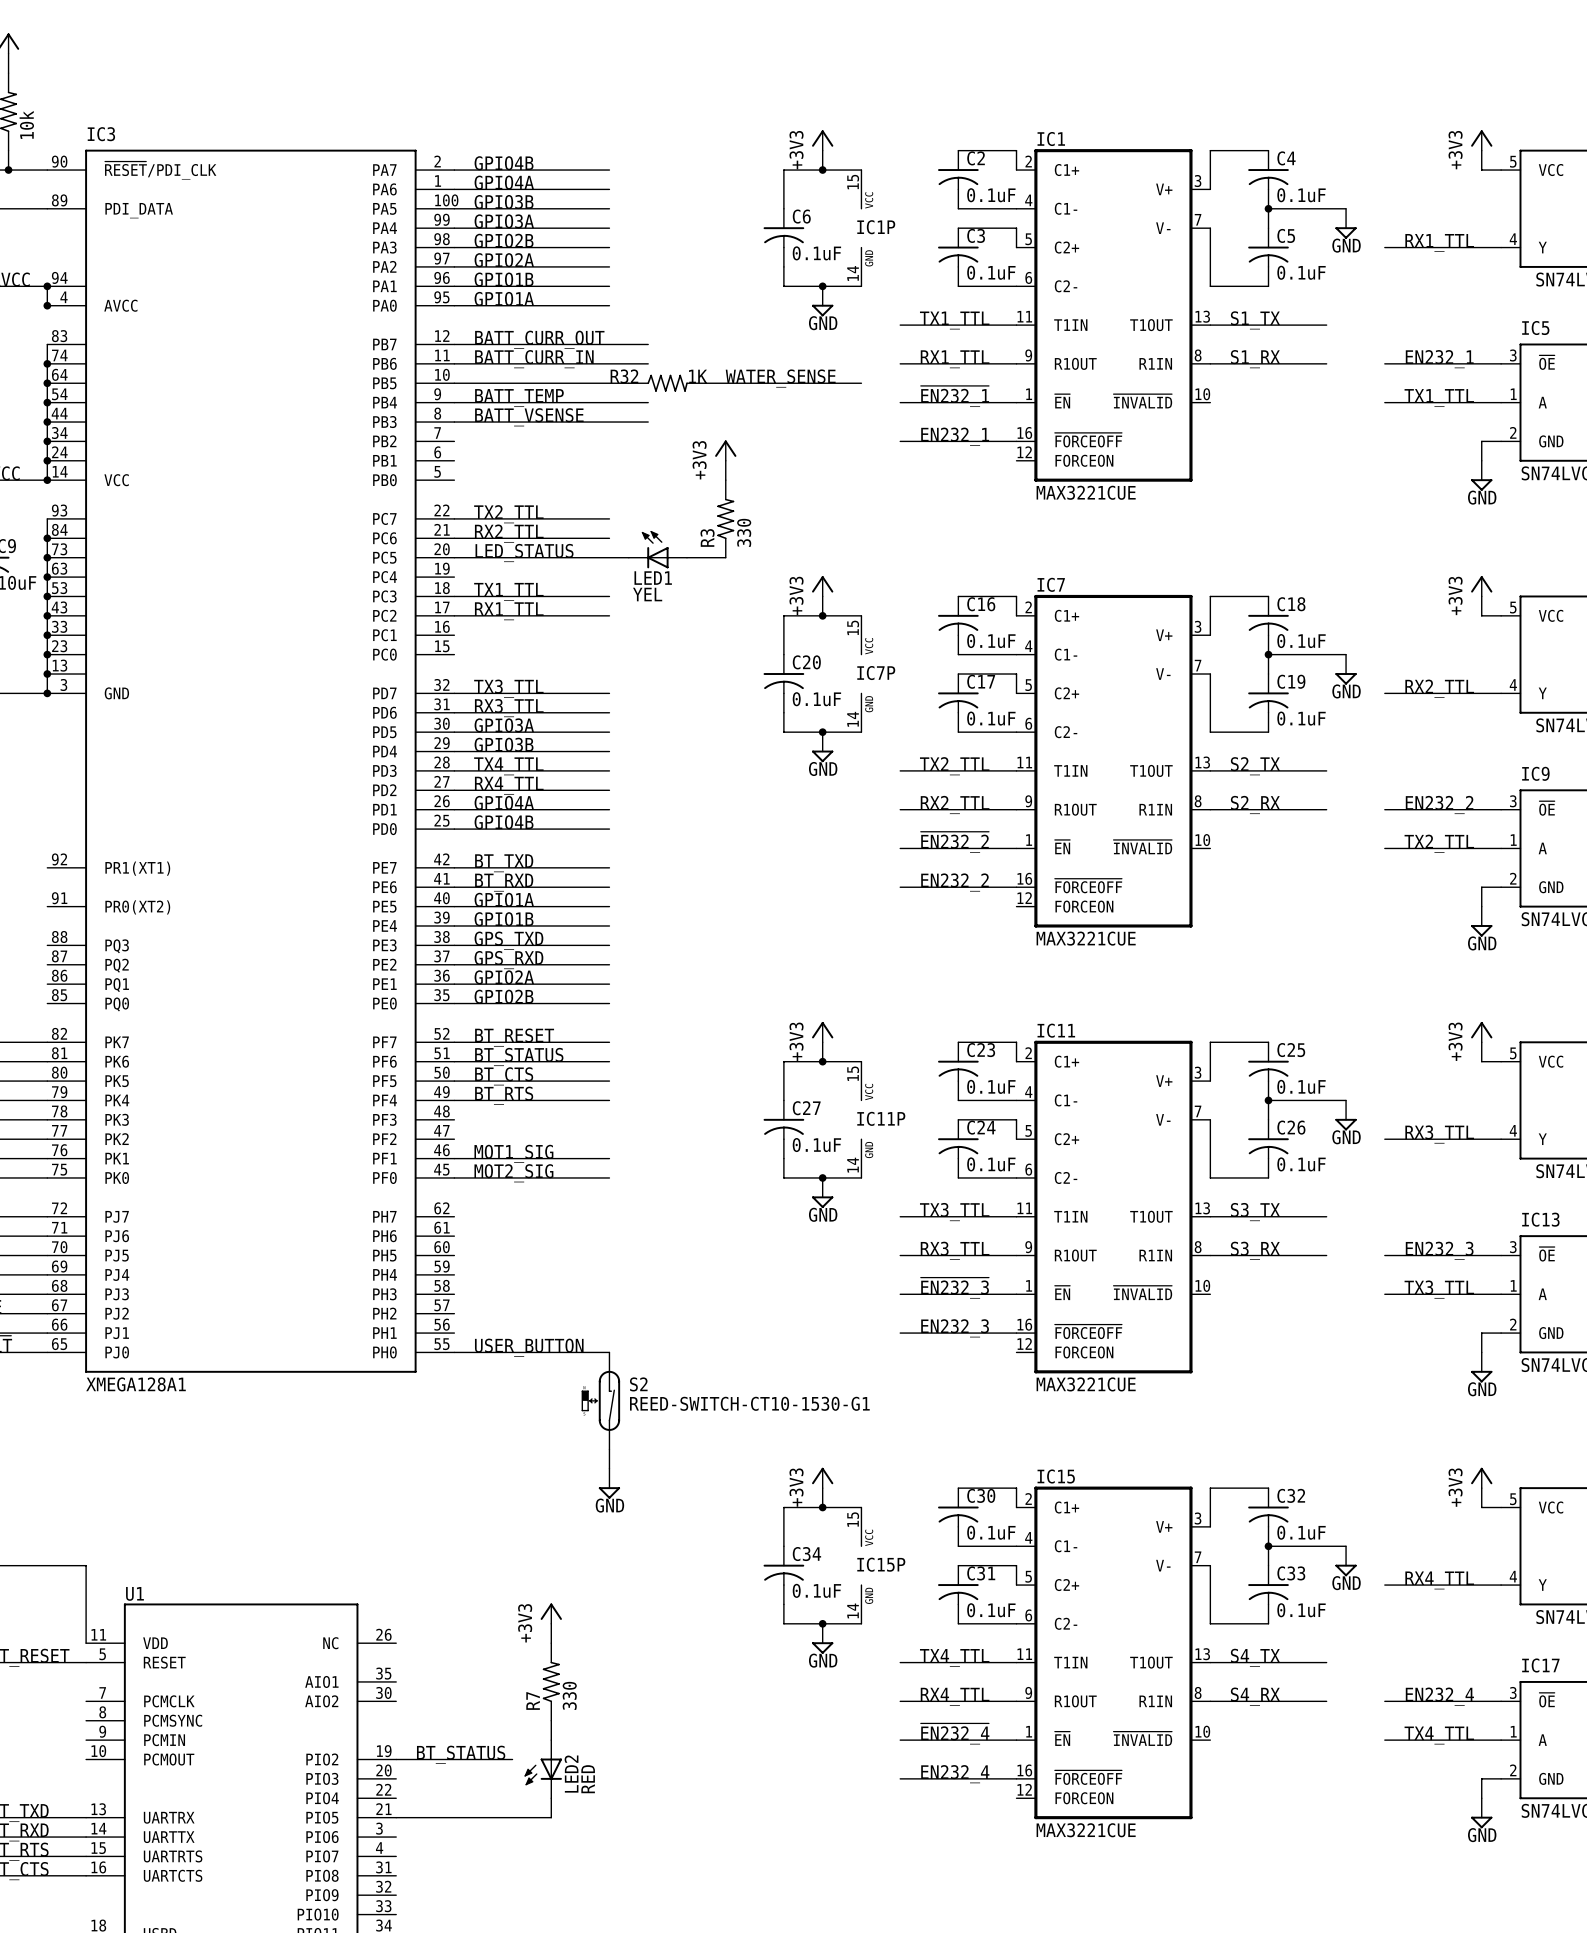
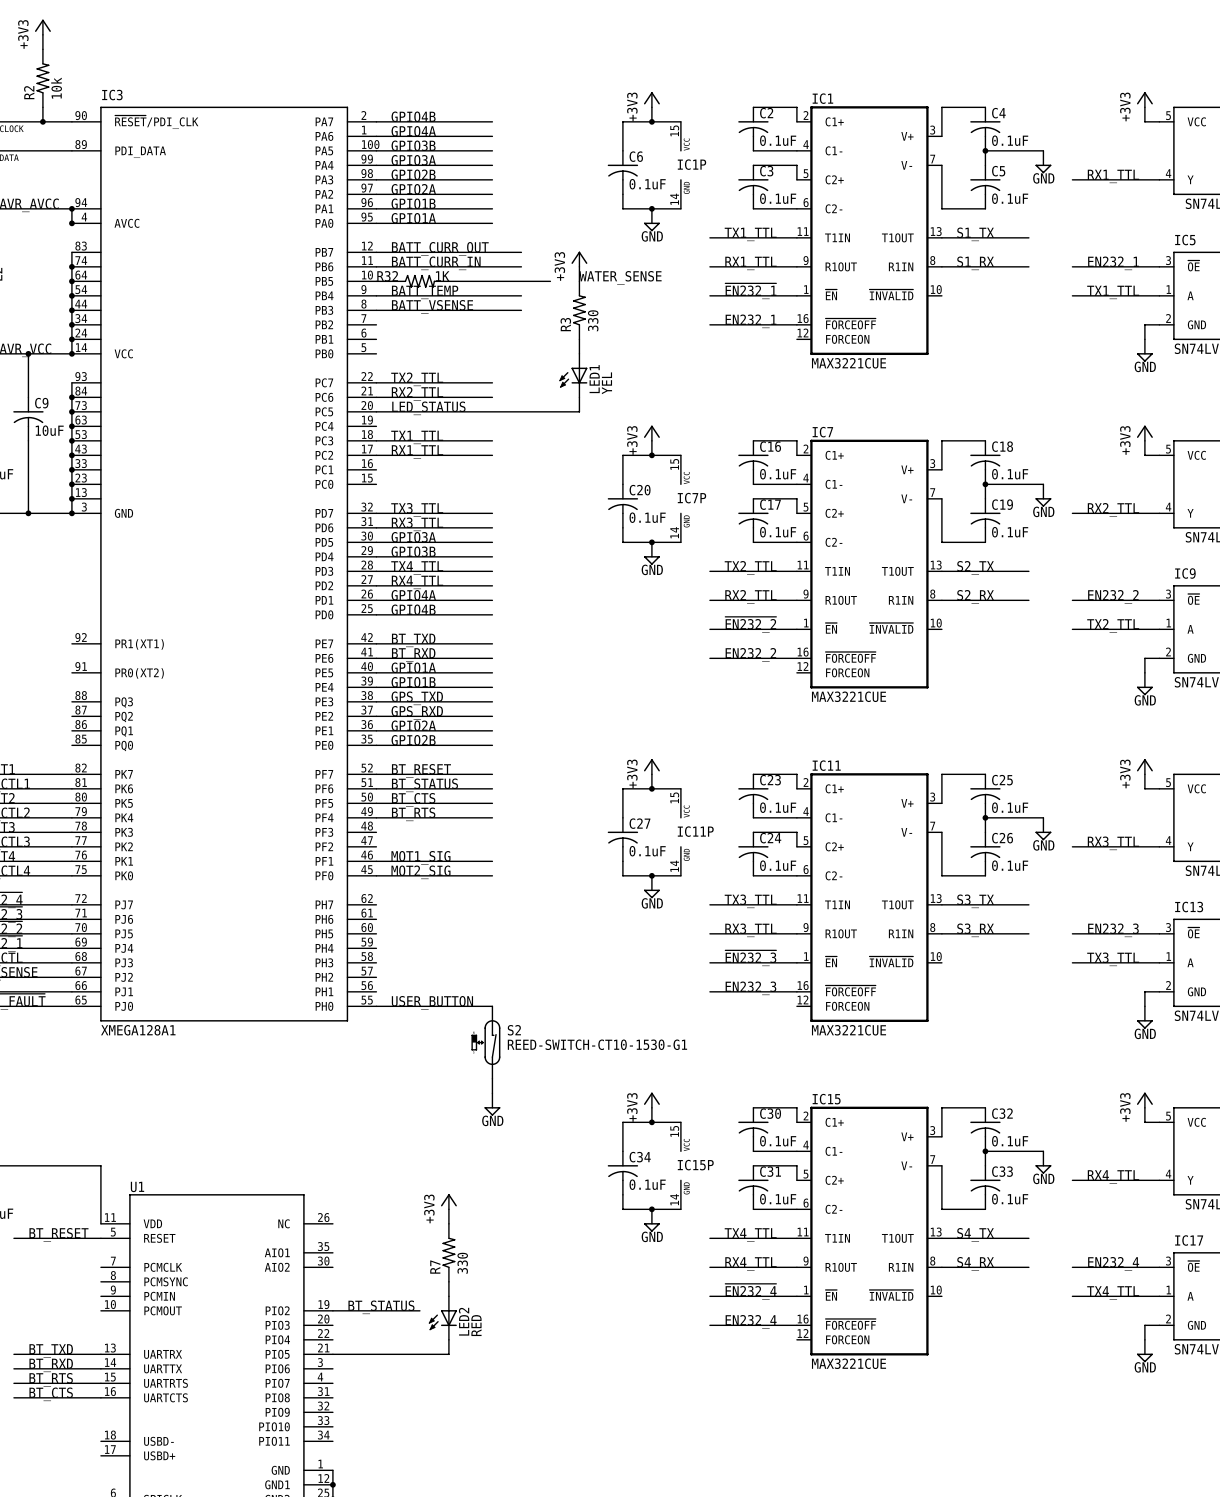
wire: none -> (579, 266) (579, 281)
R32 position: (667, 383) -> (419, 281)
wire: (706, 383) (861, 383) -> none
power symbol position: +3V3 (725, 450) -> +3V3 (579, 259)
R3 position: (725, 518) -> (579, 310)
LED1 rotation: 0° (655, 549) -> 90° counterclockwise (573, 377)
LED1 position: (657, 549) -> (573, 375)

